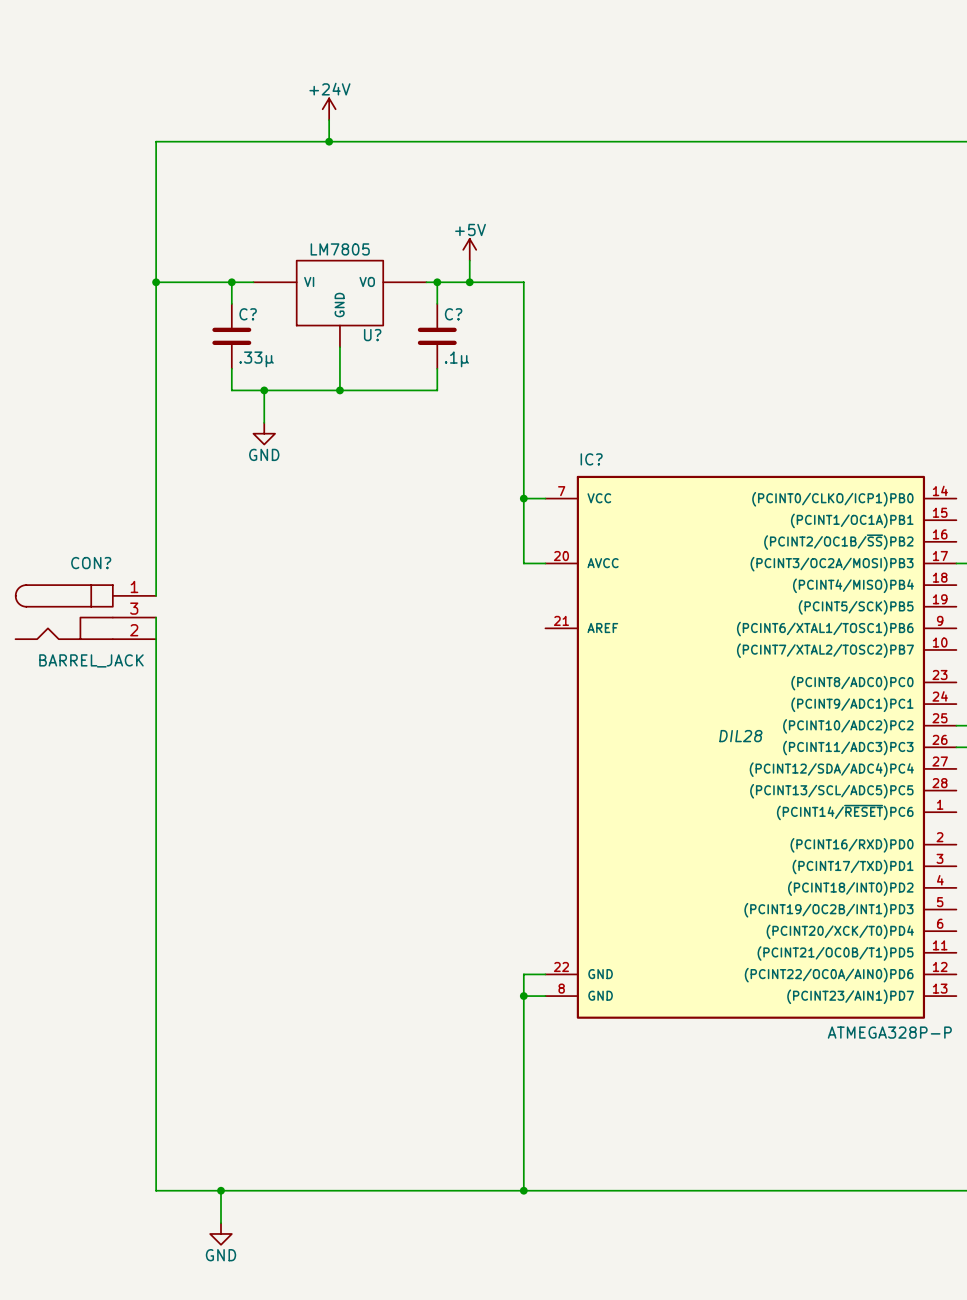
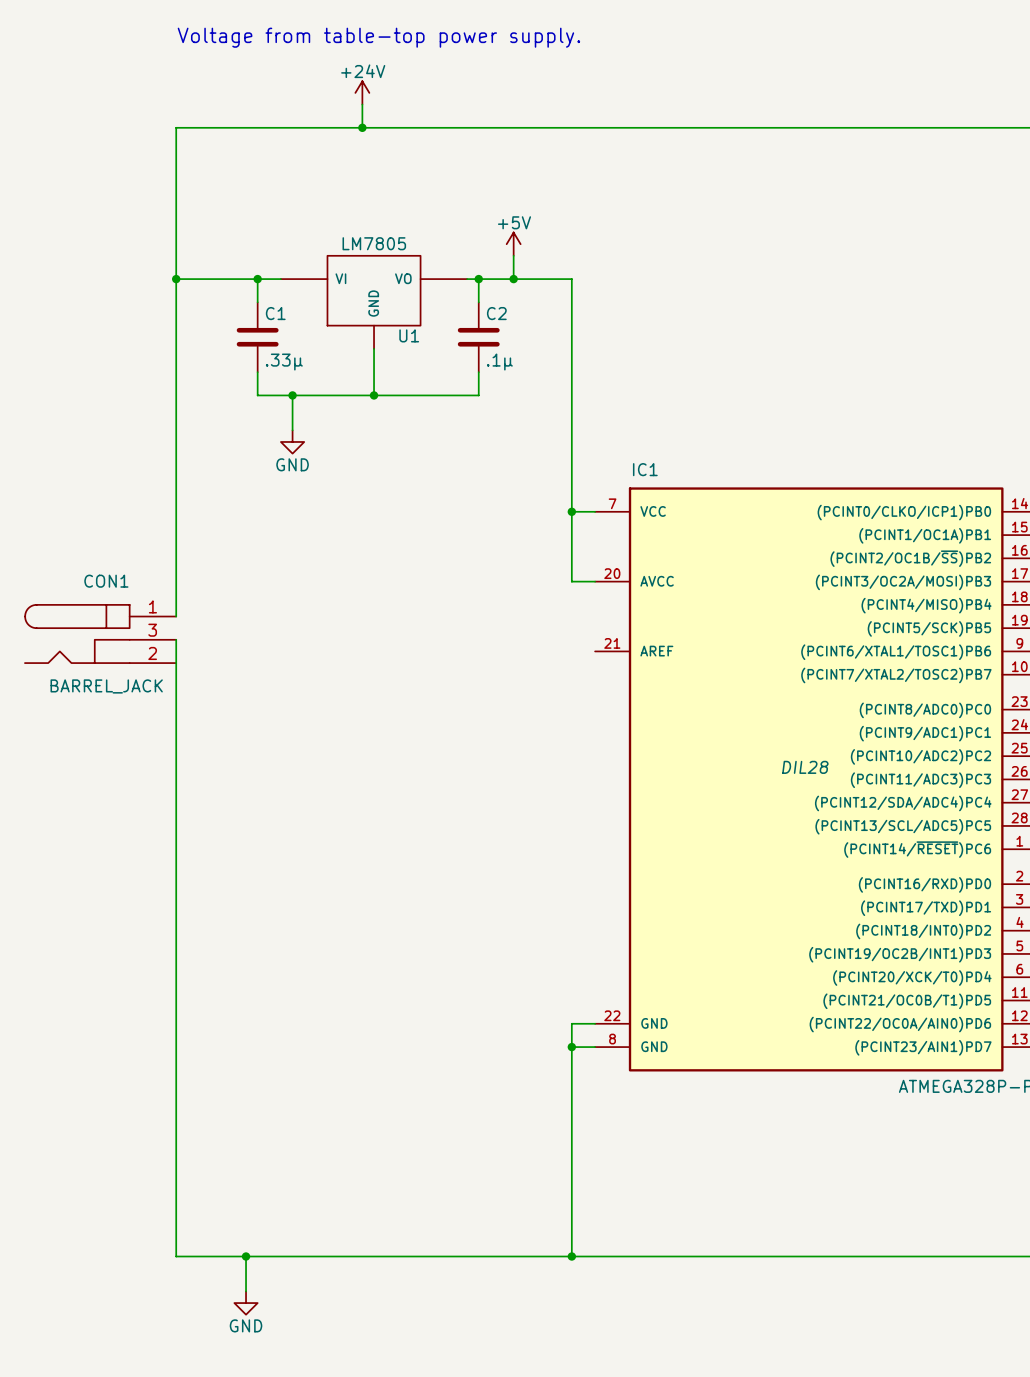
text: none -> Voltage from table-top power supply. (378, 37)
C? name: C? (248, 314) -> C1 (275, 313)
C? name: C? (453, 314) -> C2 (496, 313)
U? name: U? (372, 335) -> U1 (409, 335)
IC? name: IC? (591, 459) -> IC1 (645, 469)
CON? name: CON? (91, 563) -> CON1 (106, 581)

